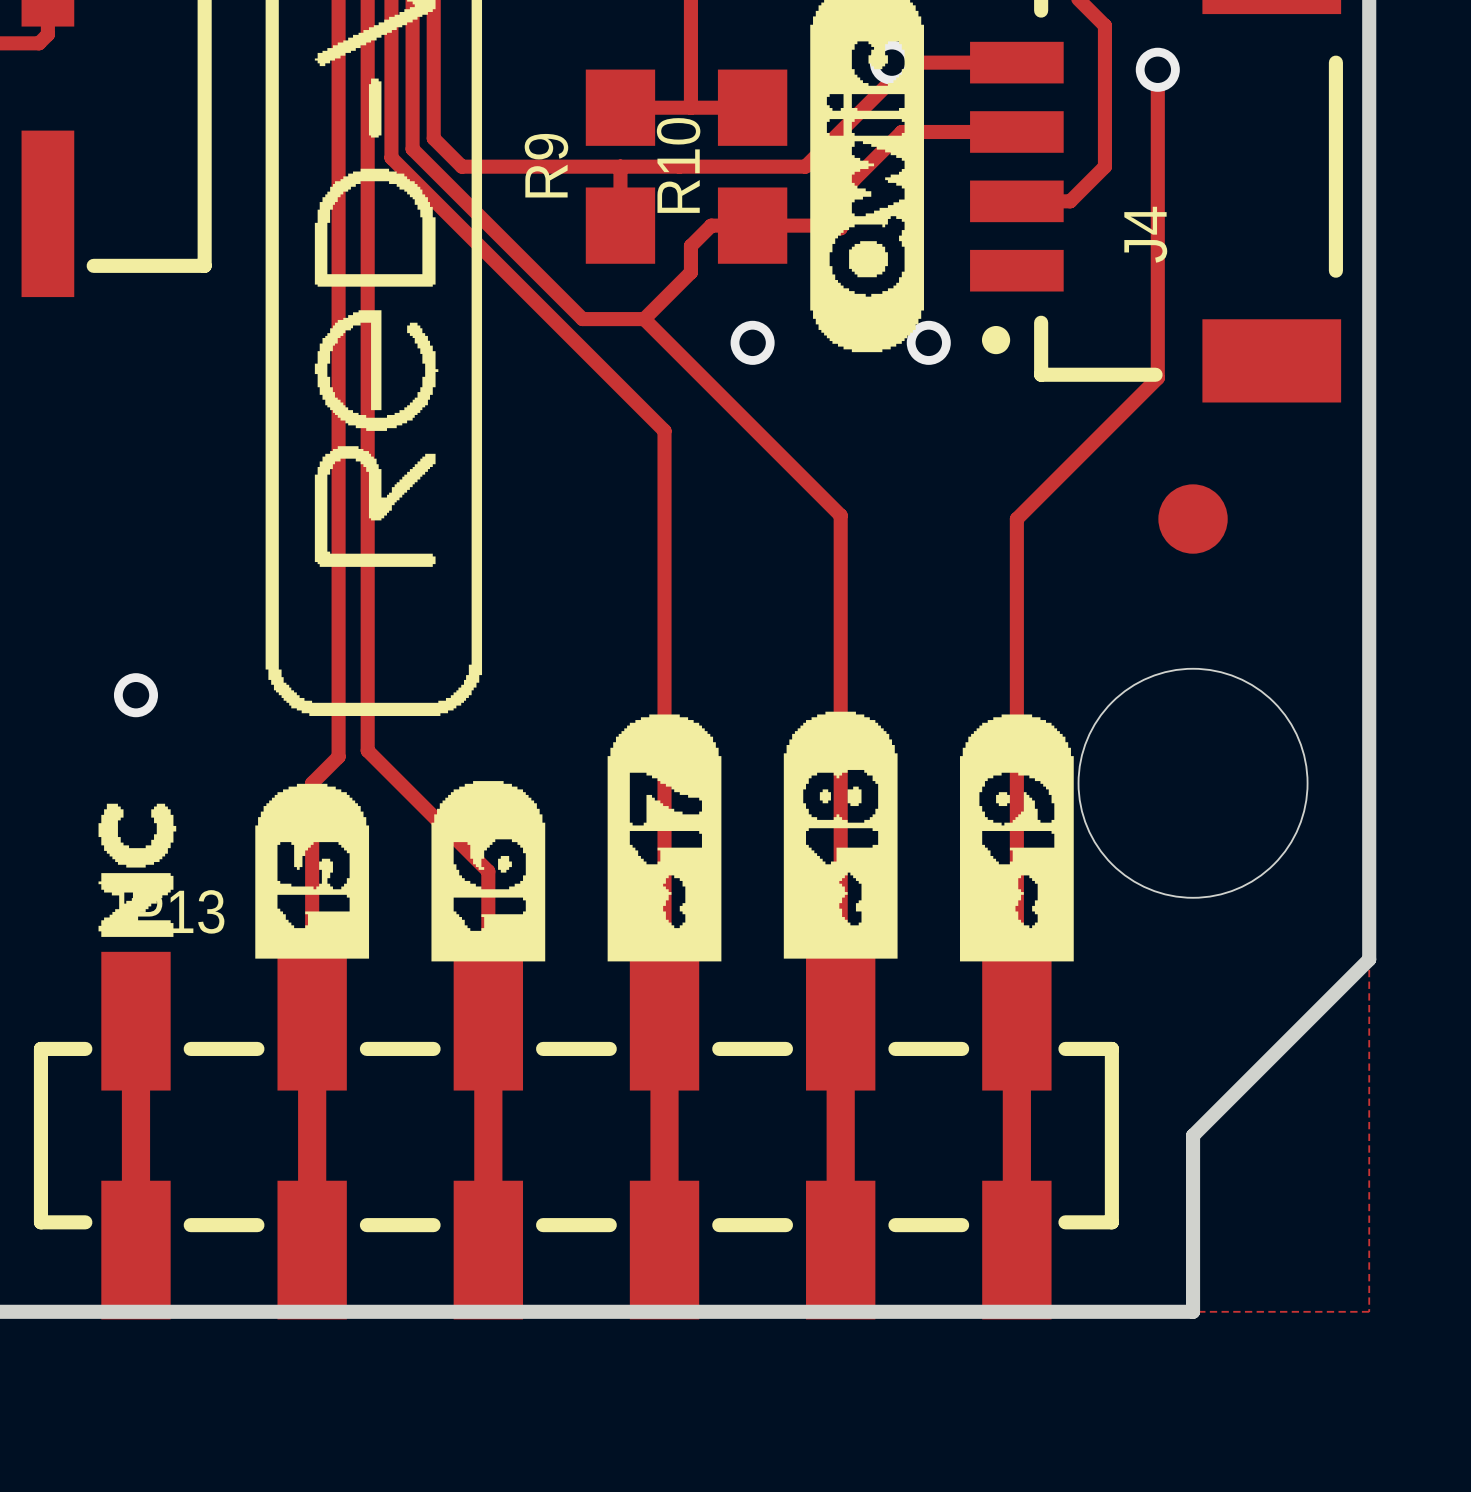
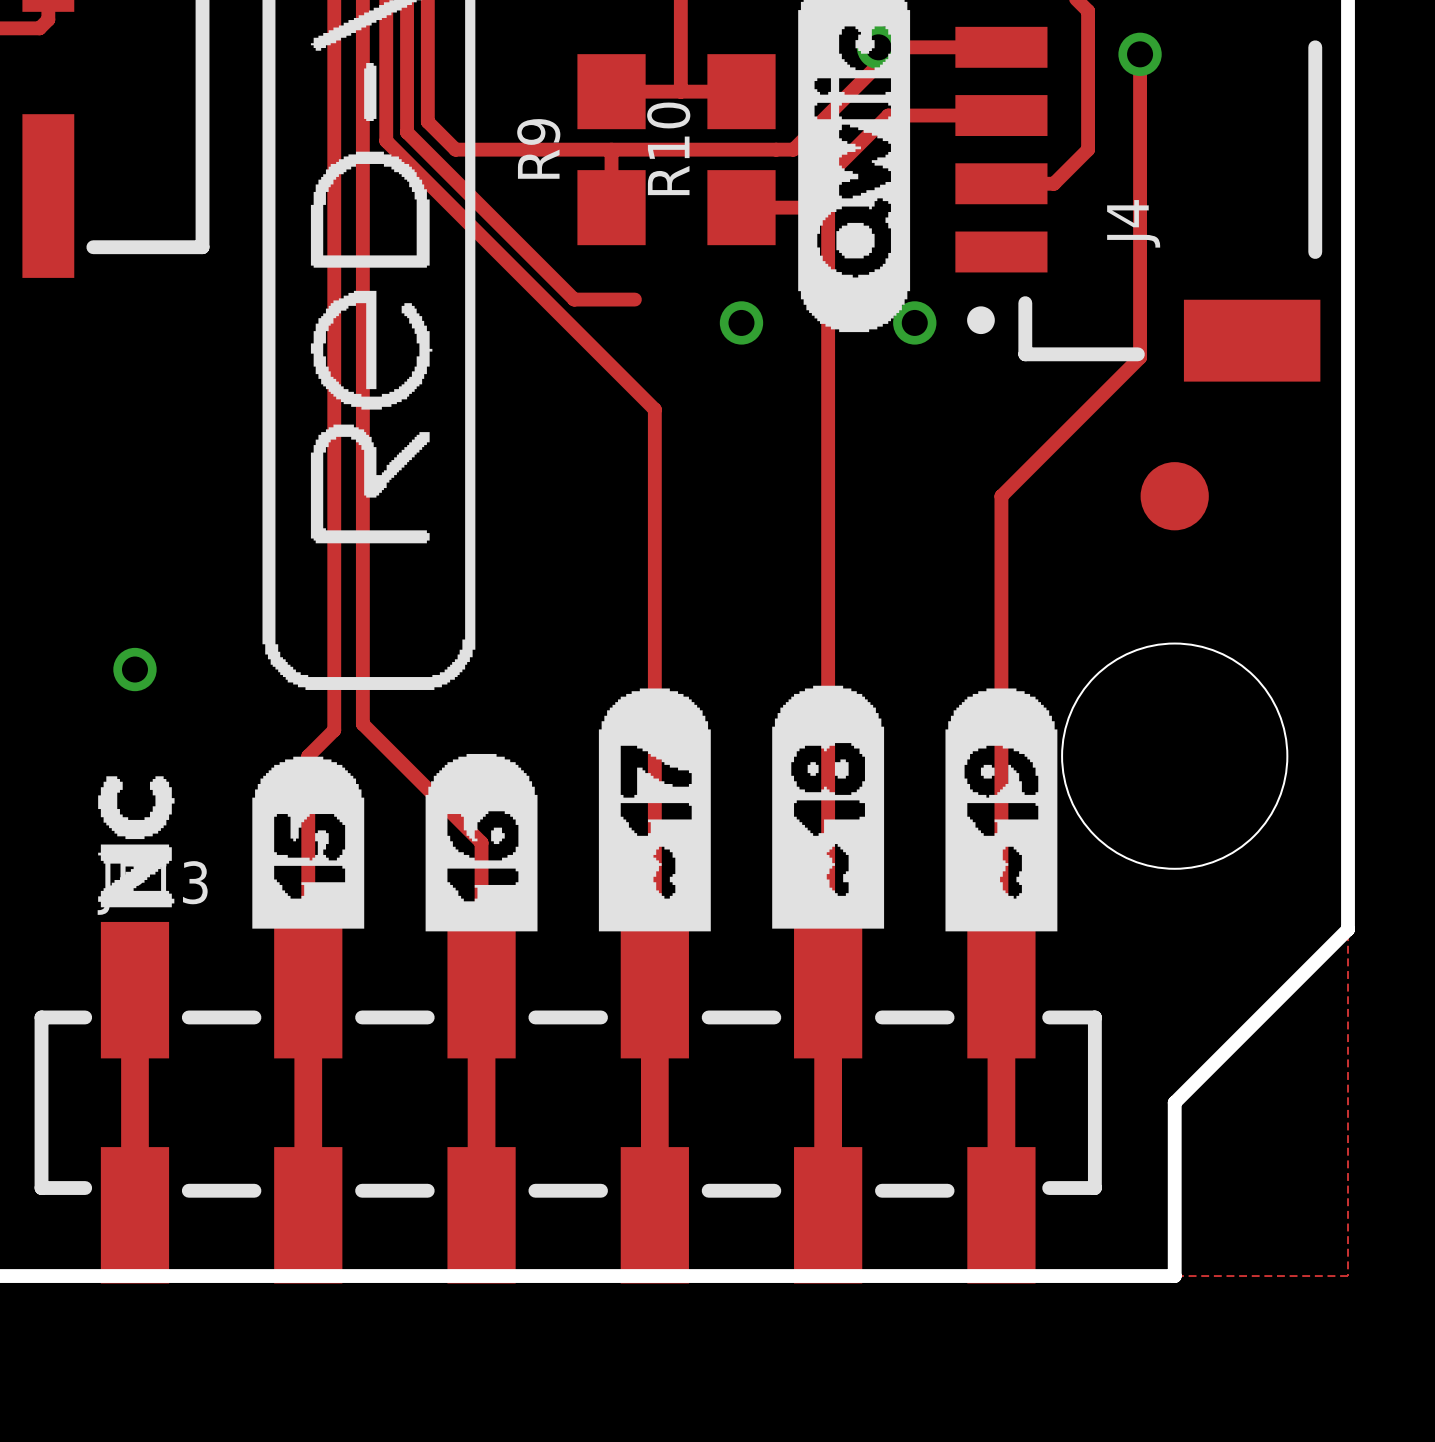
track: (752, 225) (711, 225) (690, 245) (690, 272) (644, 319) (840, 515) -> (828, 210) (828, 492)

